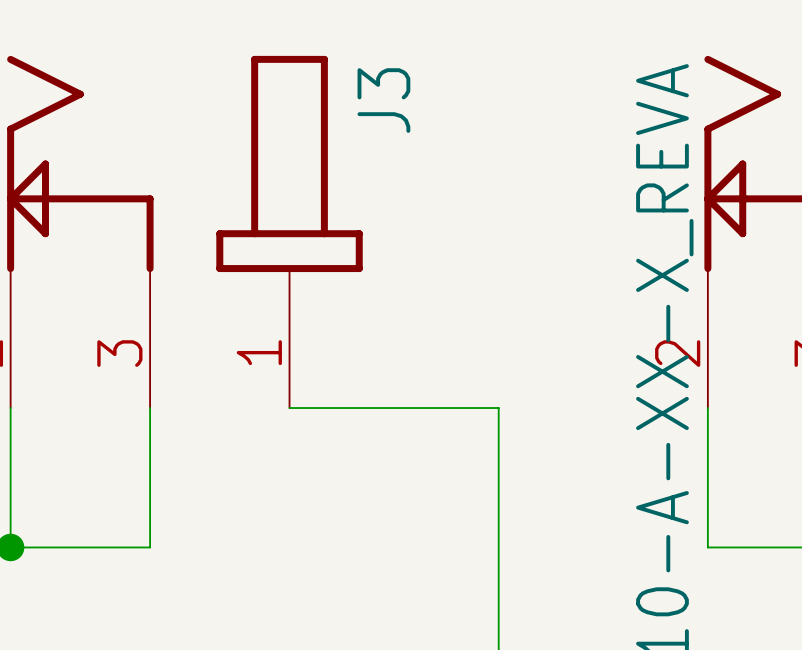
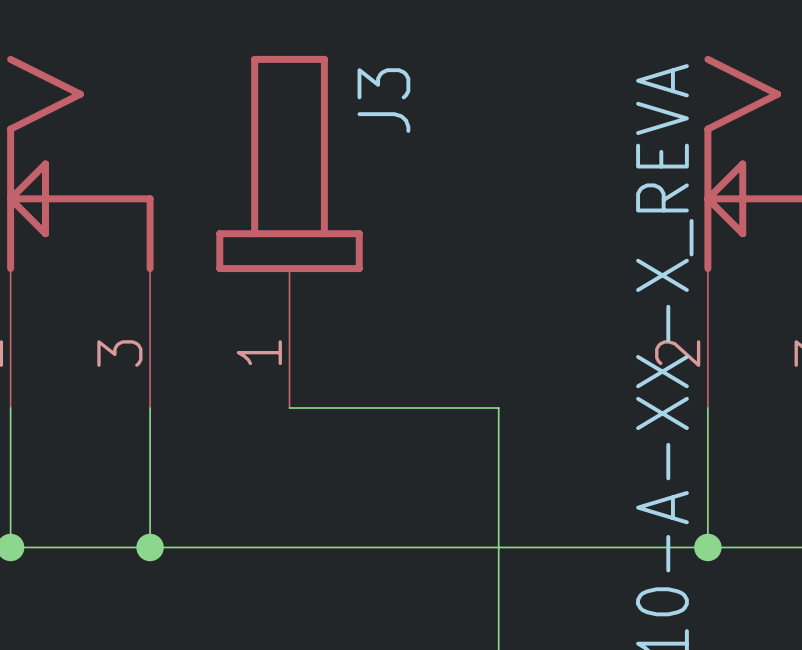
wire: none -> (150, 547) (707, 547)
junction: none -> (150, 547)
junction: none -> (707, 547)

